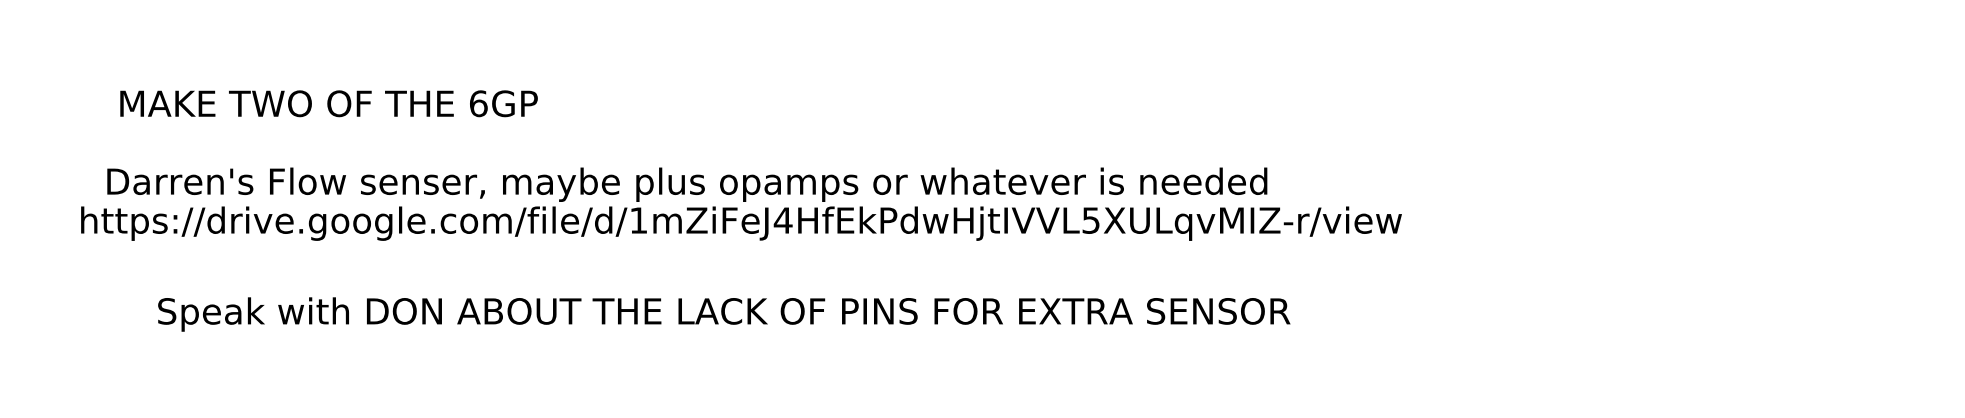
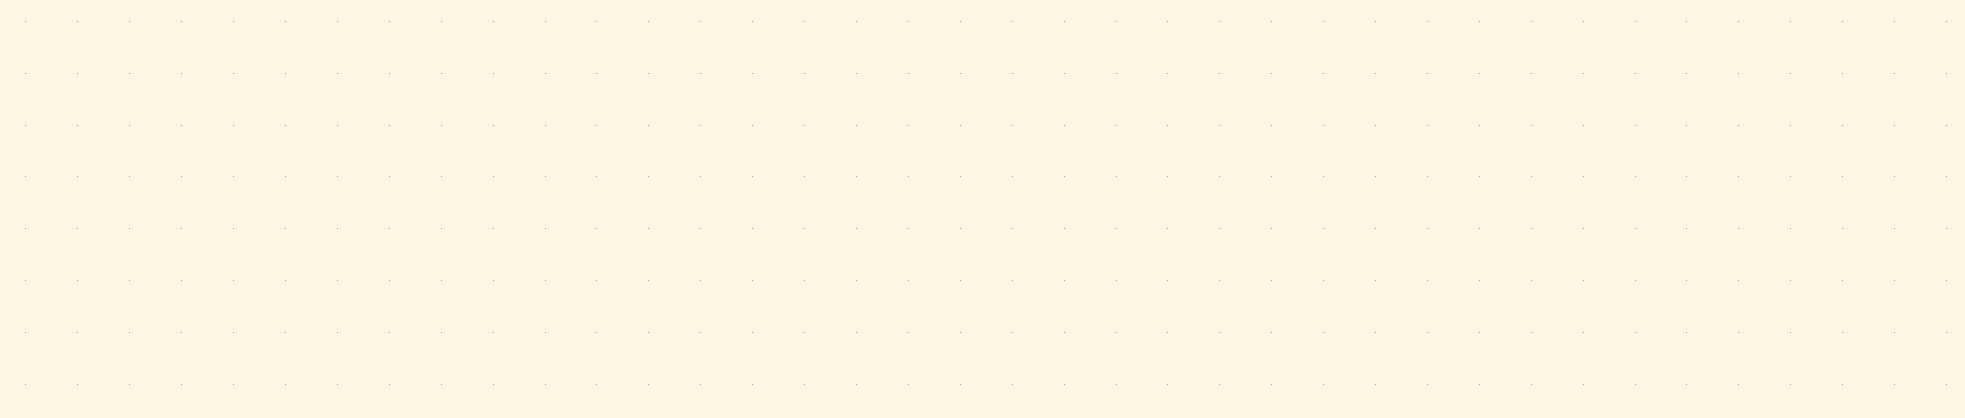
text: MAKE TWO OF THE 6GP (329, 103) -> none
text: Darren's Flow senser, maybe plus opamps or whatever is needed (687, 184) -> none
text: https://drive.google.com/file/d/1mZiFeJ4HfEkPdwHjtIVVL5XULqvMIZ-r/view (741, 223) -> none
text: Speak with DON ABOUT THE LACK OF PINS FOR EXTRA SENSOR (724, 314) -> none

